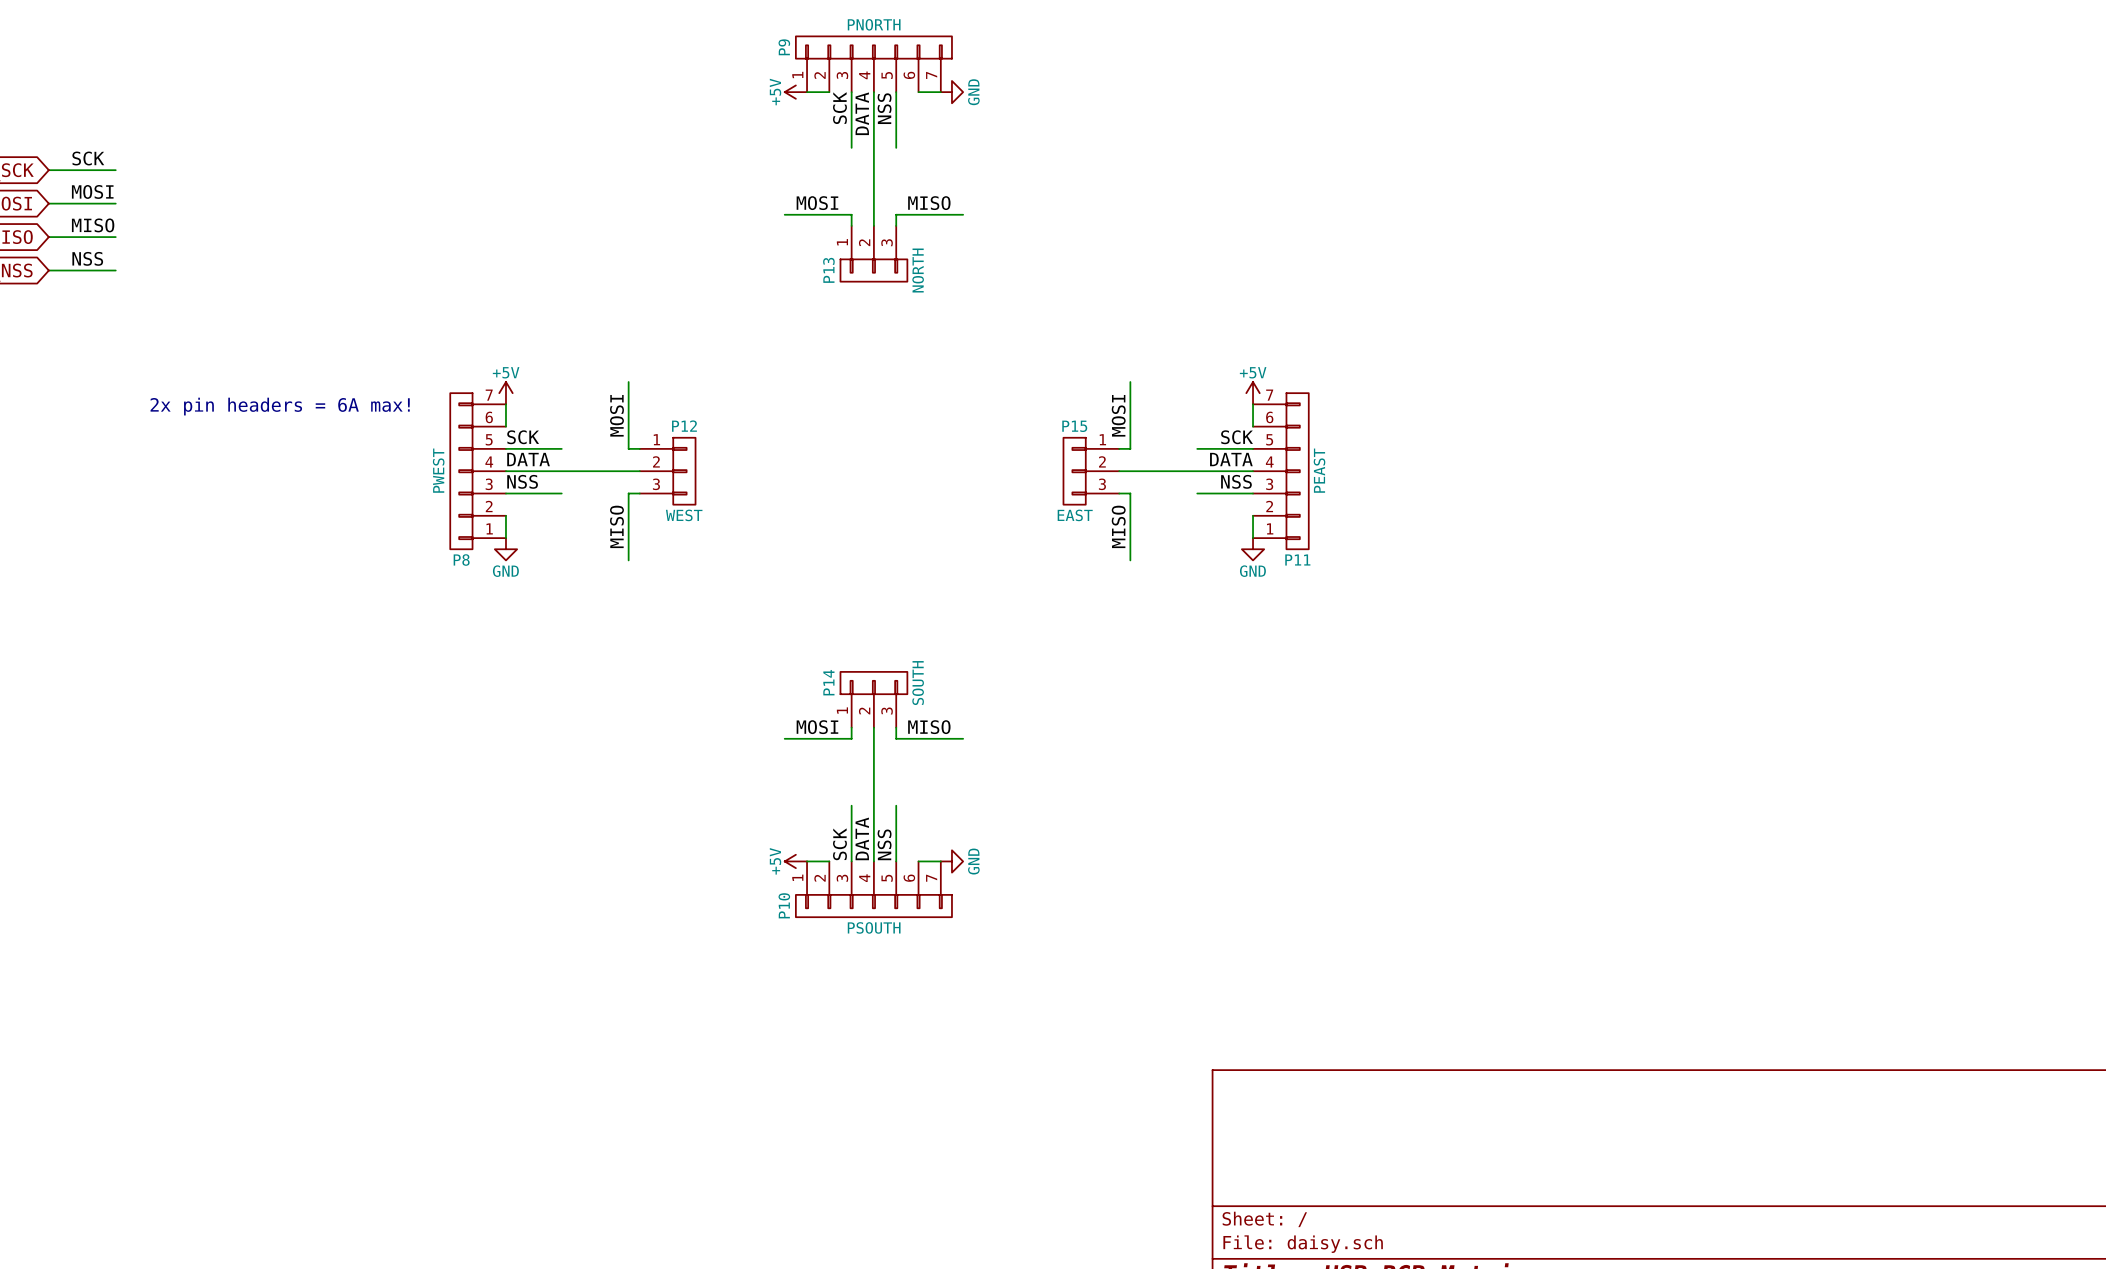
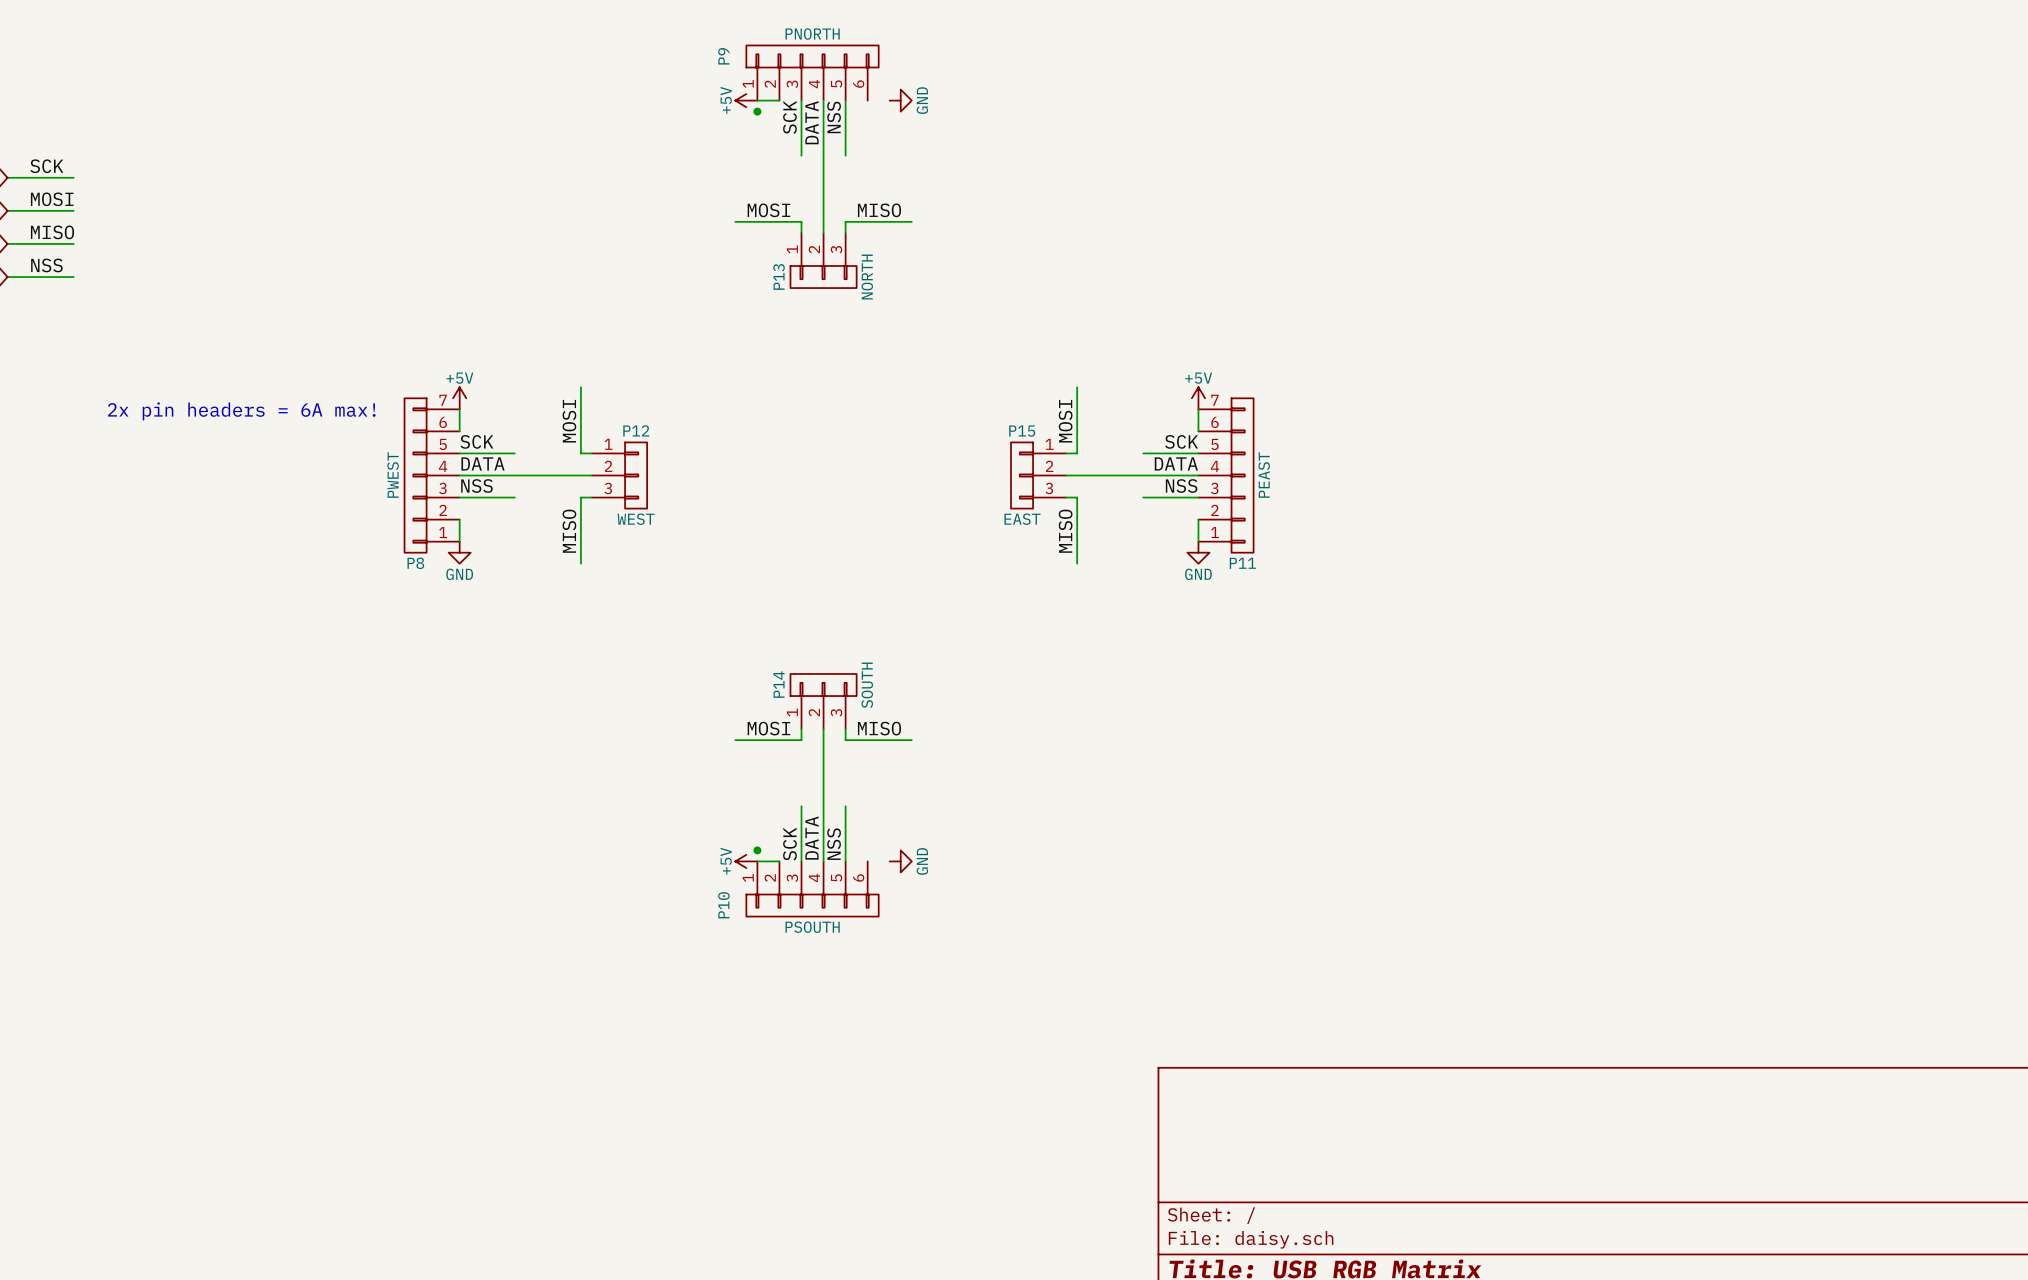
P9 symbol: [795, 36, 952, 93] -> [746, 45, 879, 101]
wire: (918, 92) (940, 92) -> none
junction: none -> (757, 111)
junction: none -> (757, 850)
P10 symbol: [795, 861, 952, 918] -> [746, 861, 879, 917]
wire: (918, 861) (940, 861) -> none

